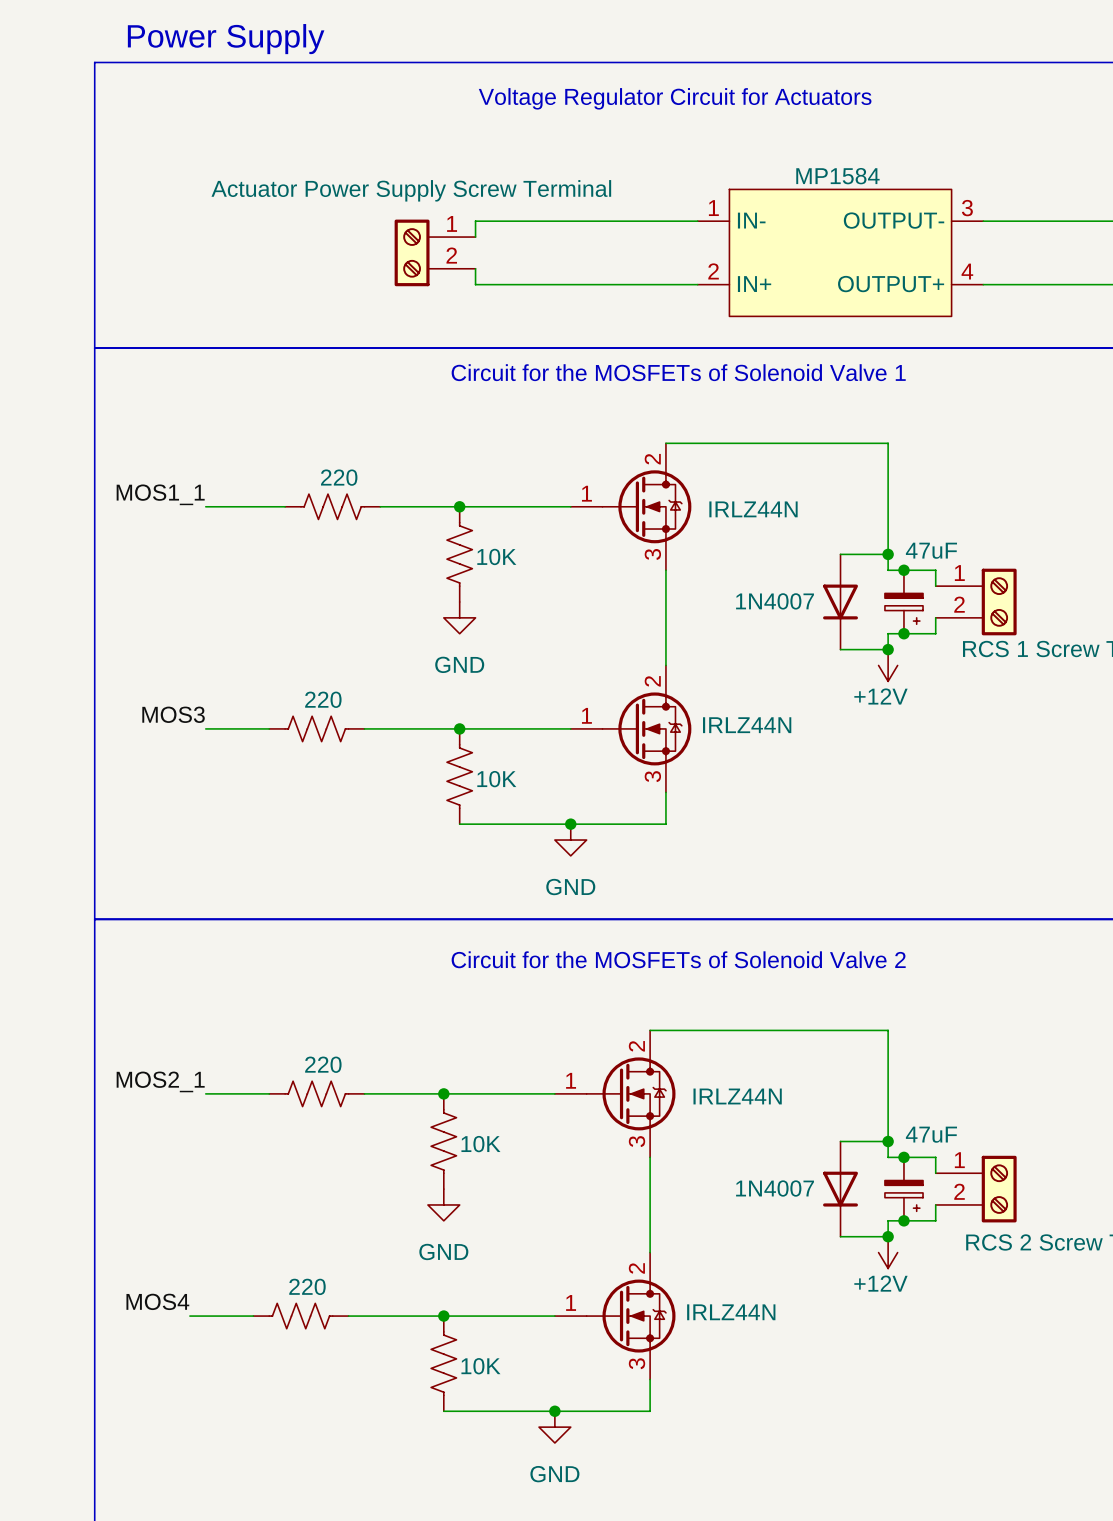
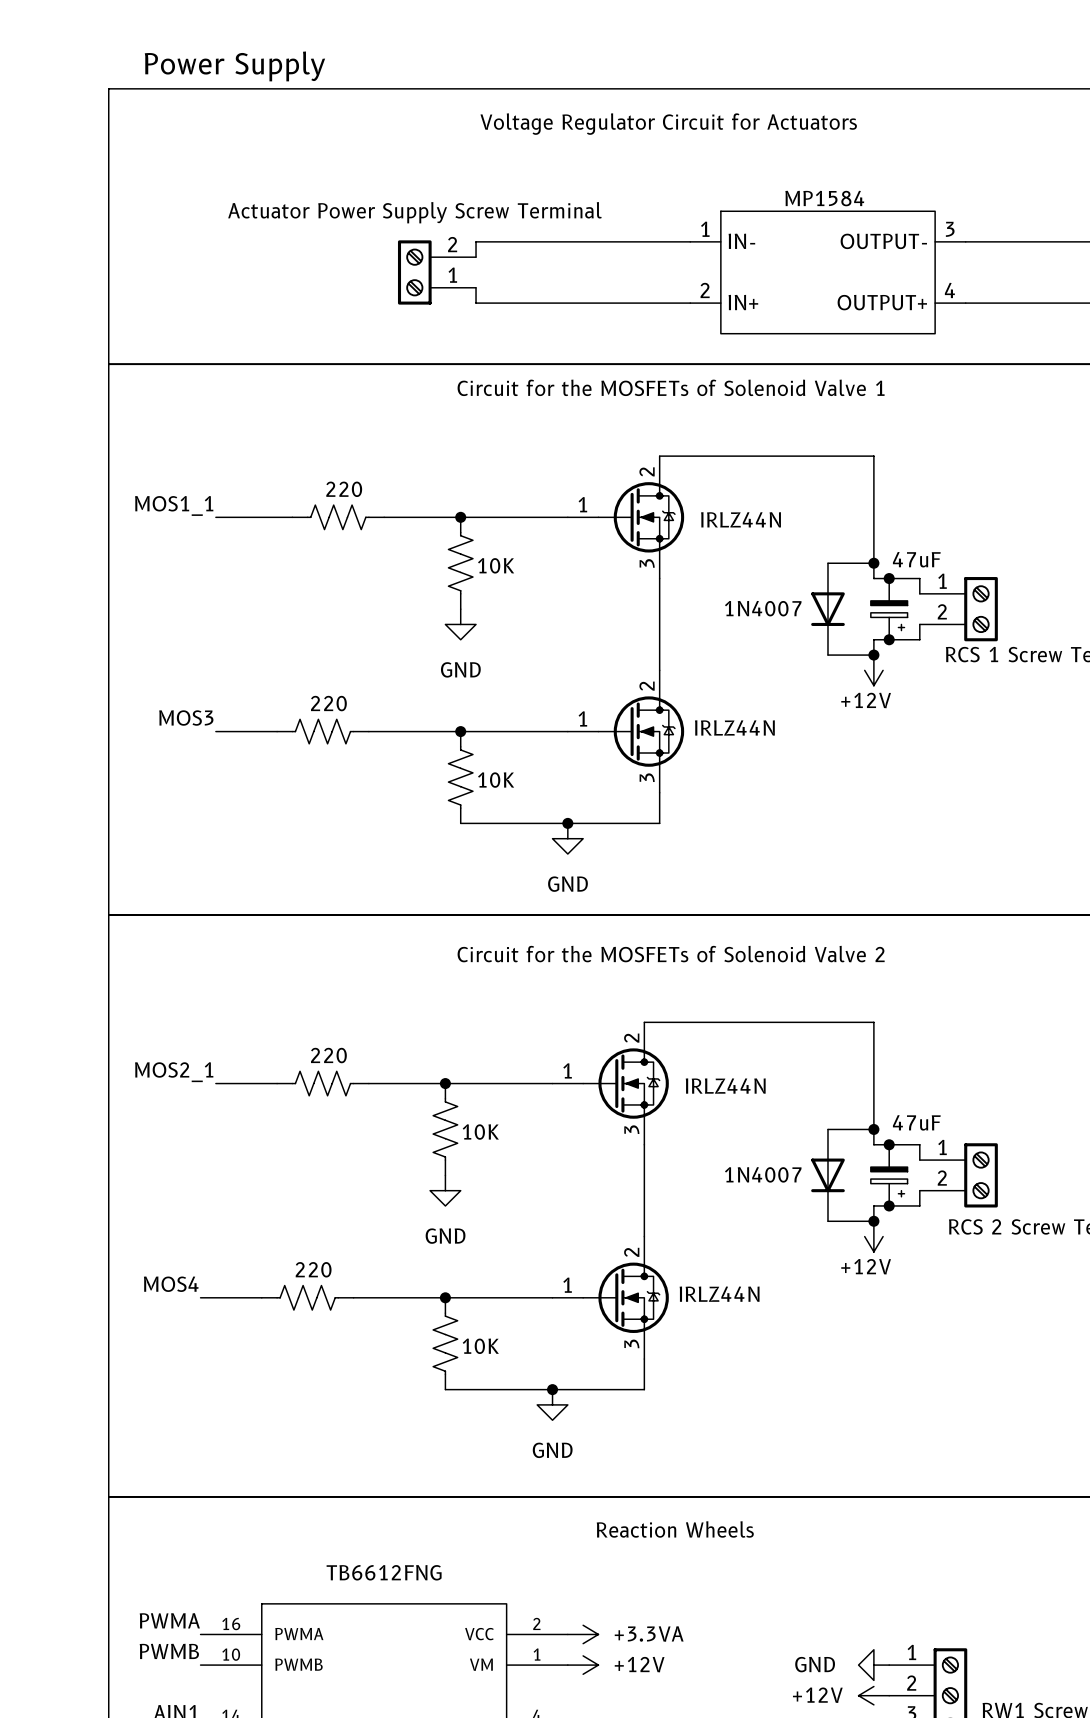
part pin number: 1 (452, 223) -> 2 (452, 244)
part pin number: 2 (451, 255) -> 1 (452, 275)

